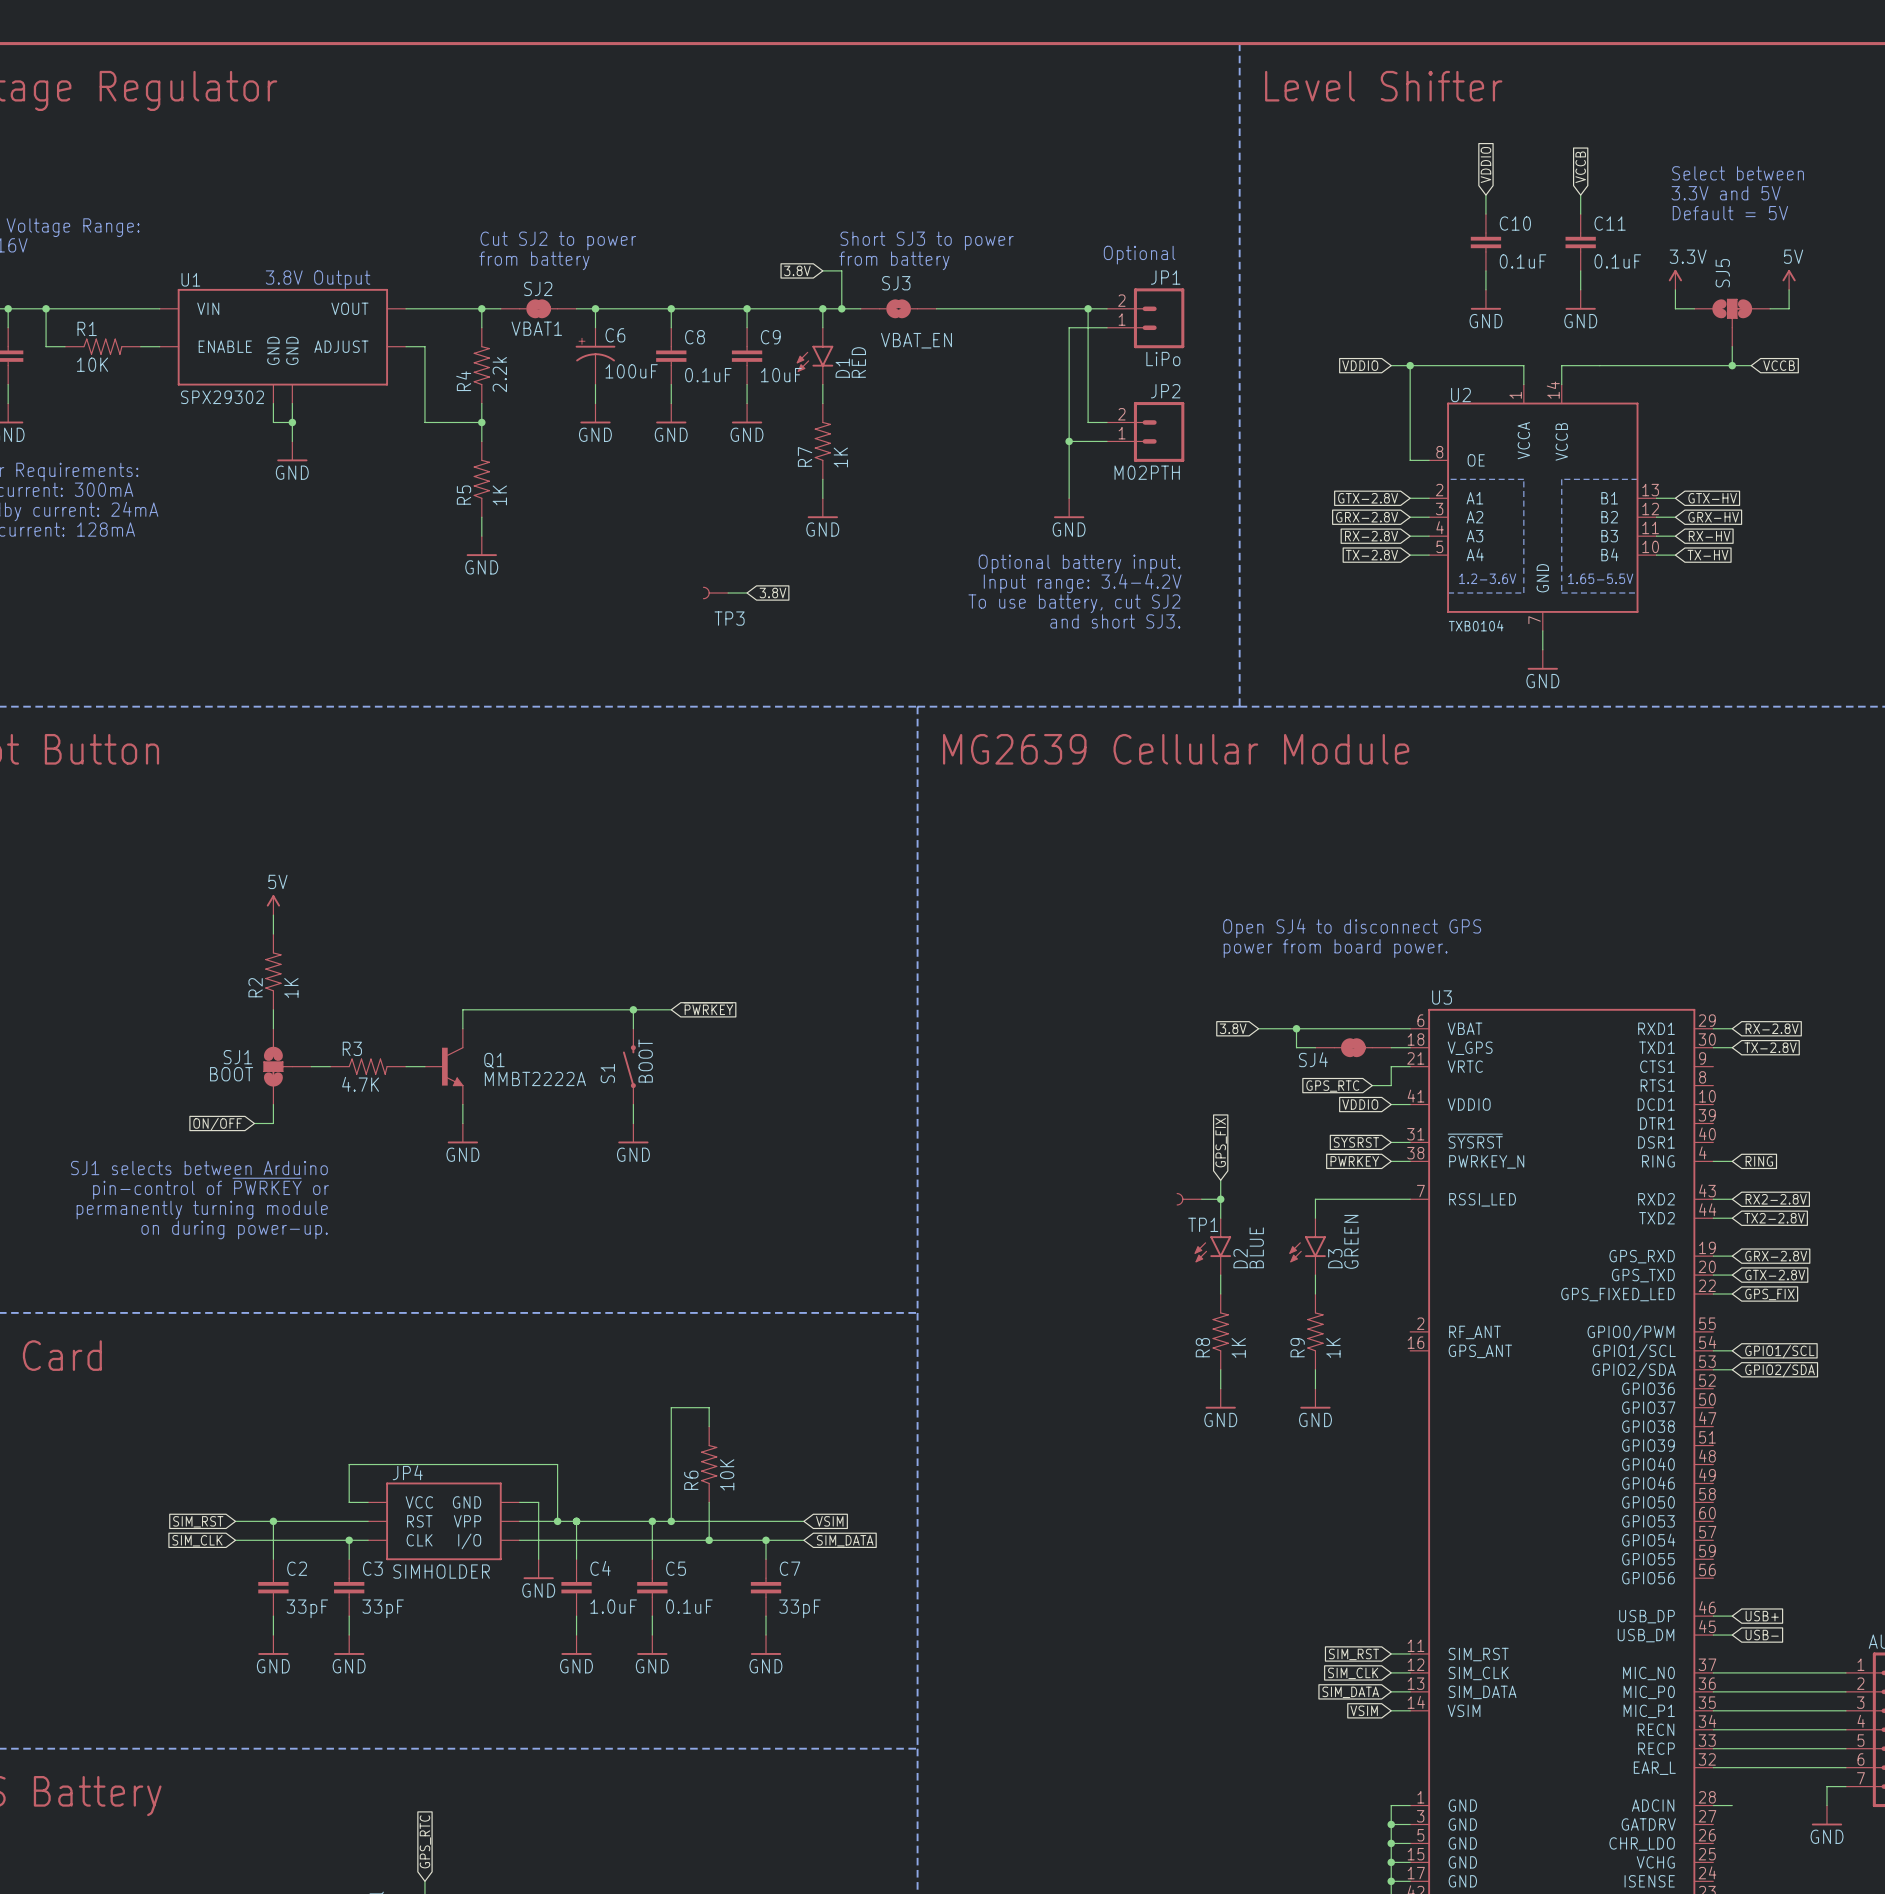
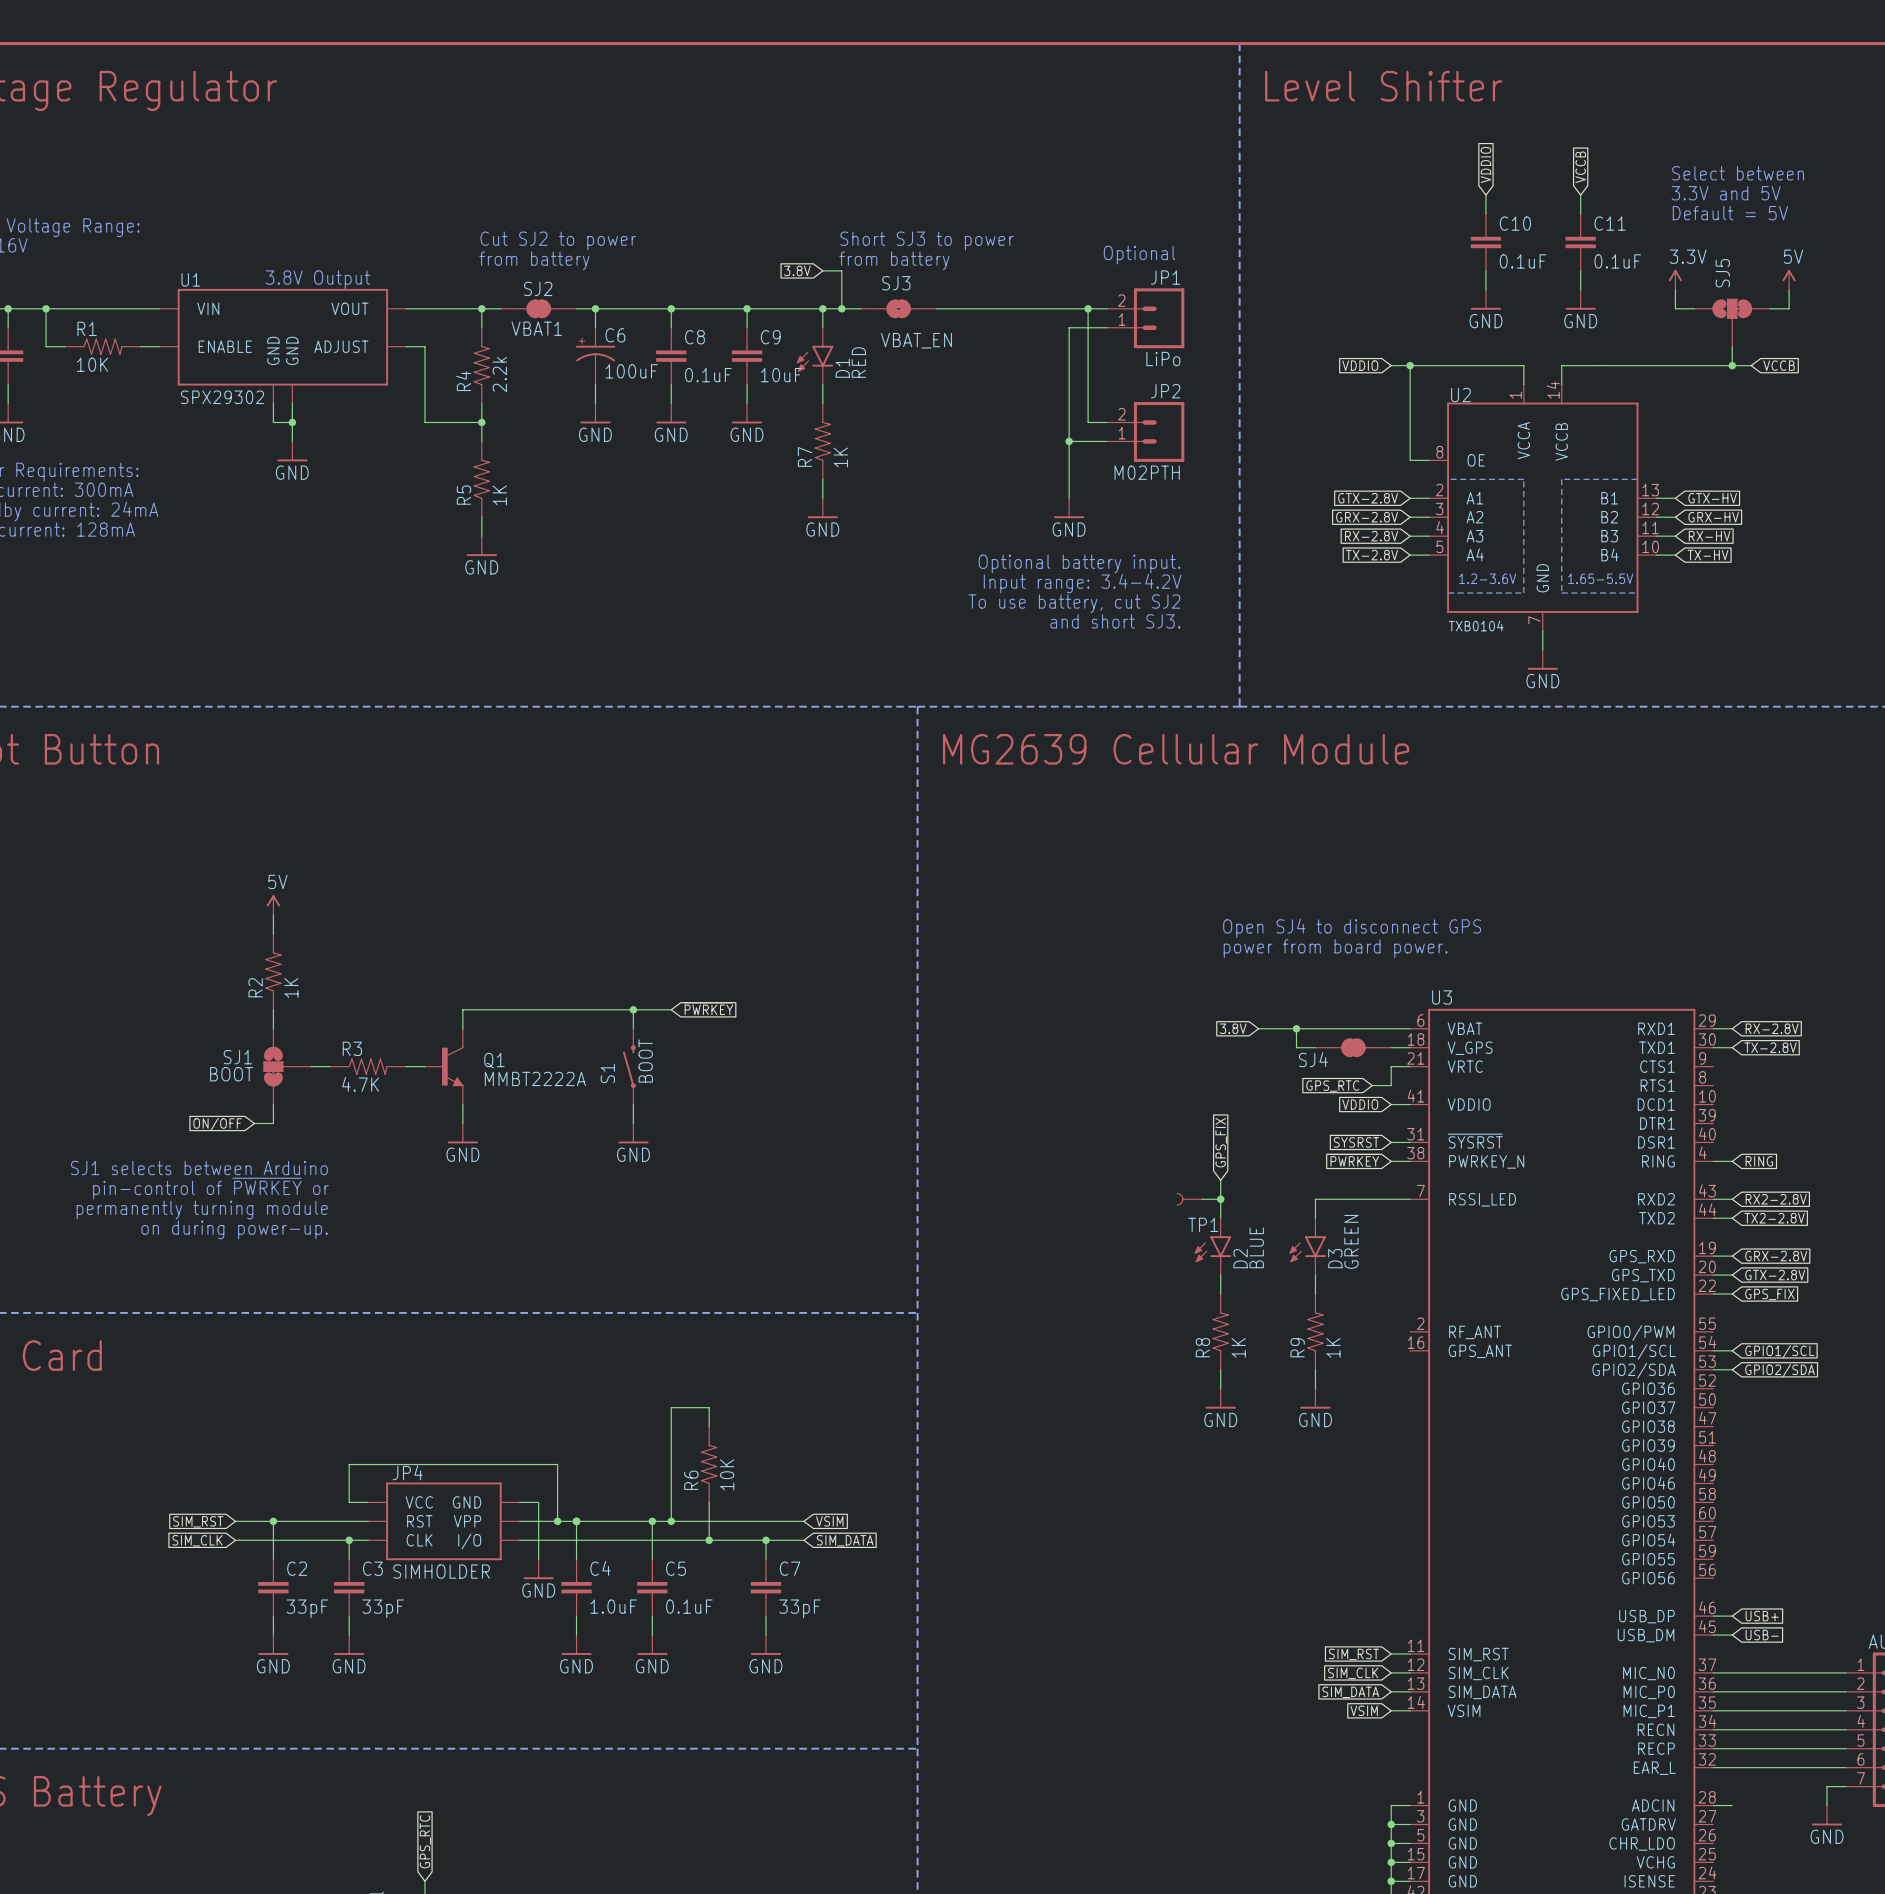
TP3: (715, 593) -> none
wire: (728, 593) (747, 593) -> none
global label: 3.8V (772, 593) -> none

